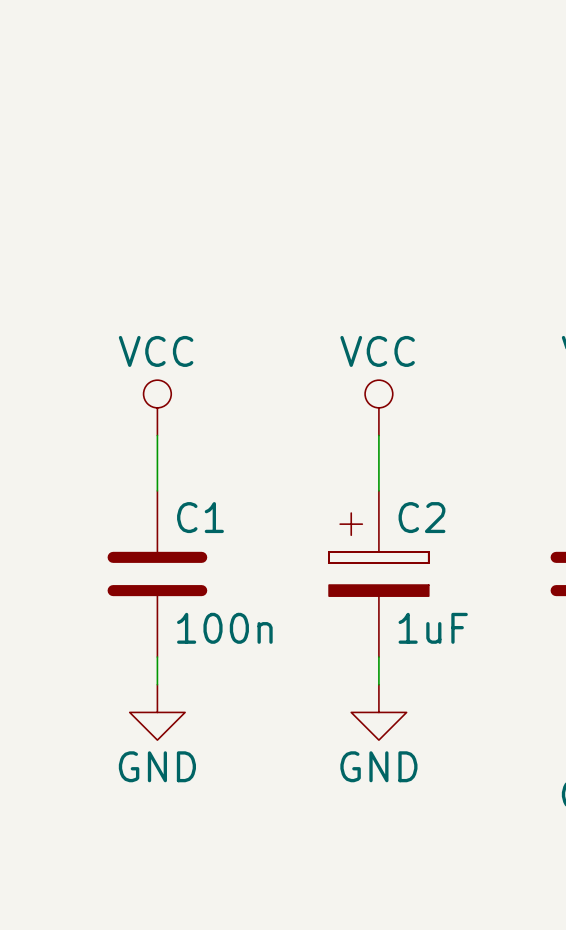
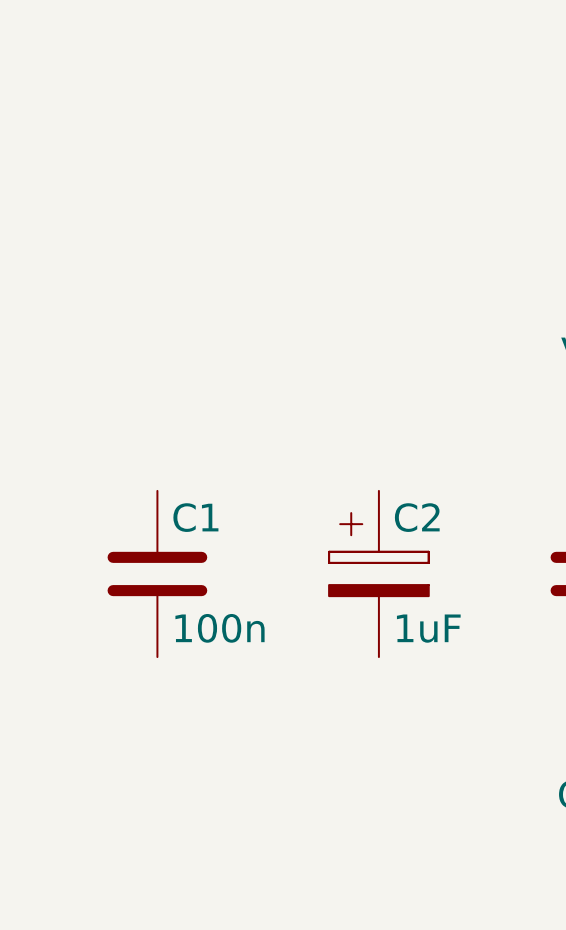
power symbol: VCC (157, 407) -> none
power symbol: VCC (378, 407) -> none
wire: (157, 435) (157, 490) -> none
wire: (378, 435) (378, 490) -> none
wire: (157, 657) (157, 684) -> none
wire: (378, 657) (378, 684) -> none
power symbol: GND (157, 712) -> none
power symbol: GND (378, 712) -> none

